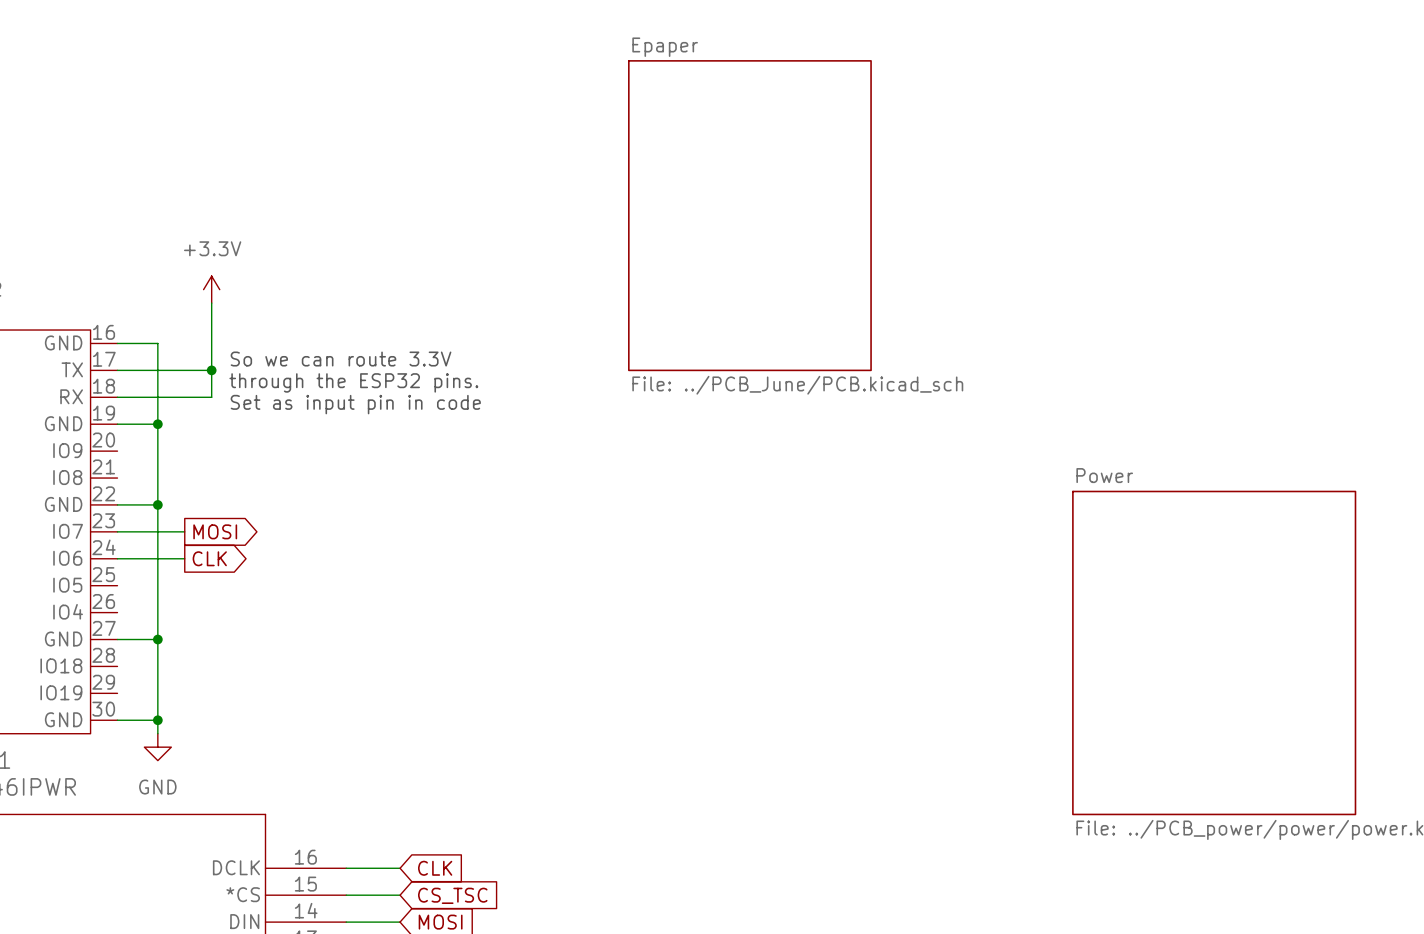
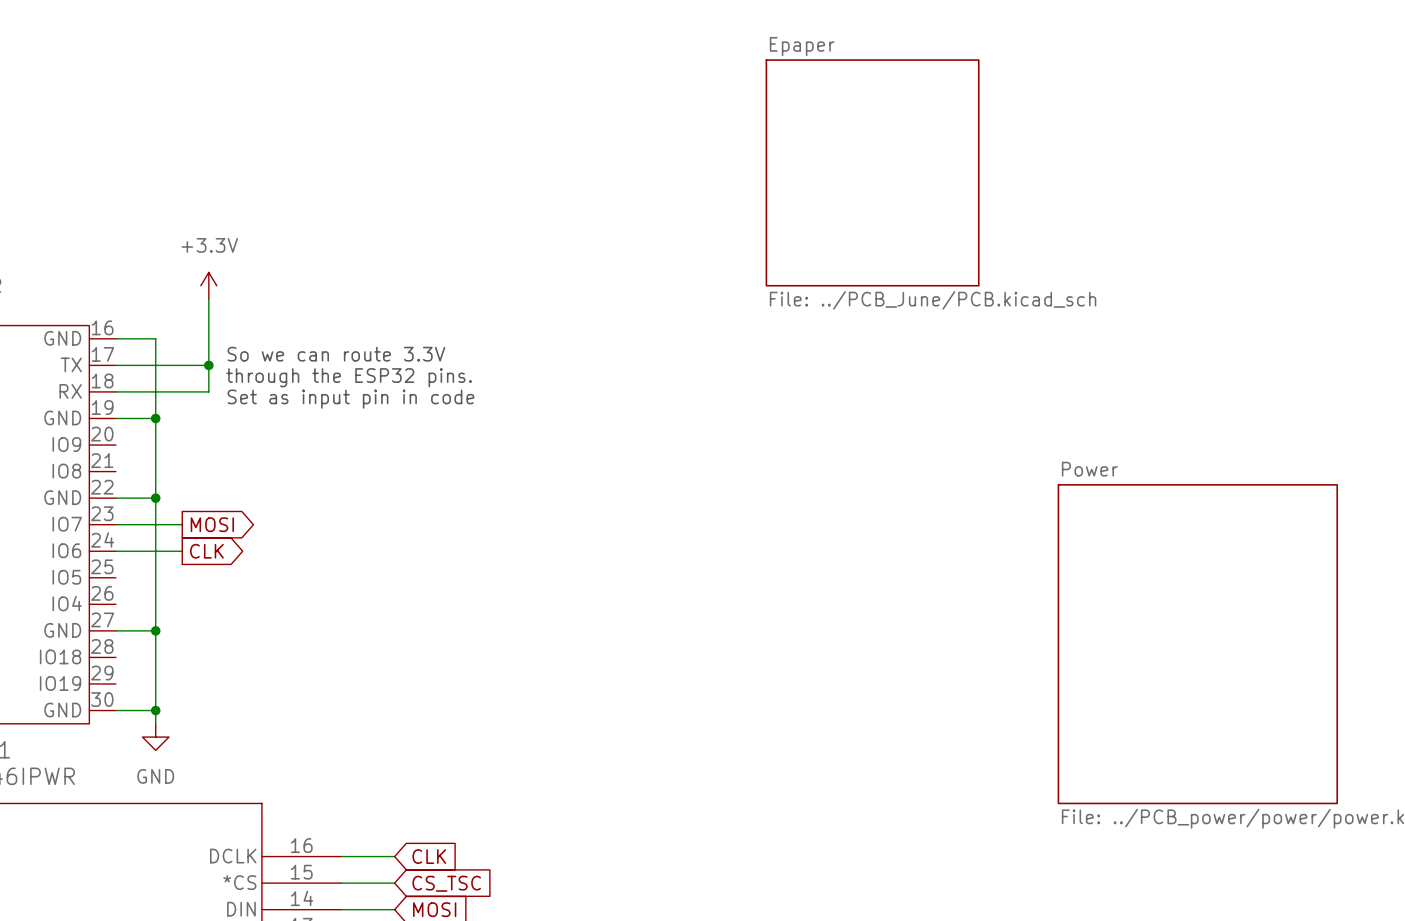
sheet Epaper: none -> File: ../PCB_June/PCB.kicad_sch (872, 172)
sheet Epaper: File: ../PCB_June/PCB.kicad_sch (749, 215) -> none

